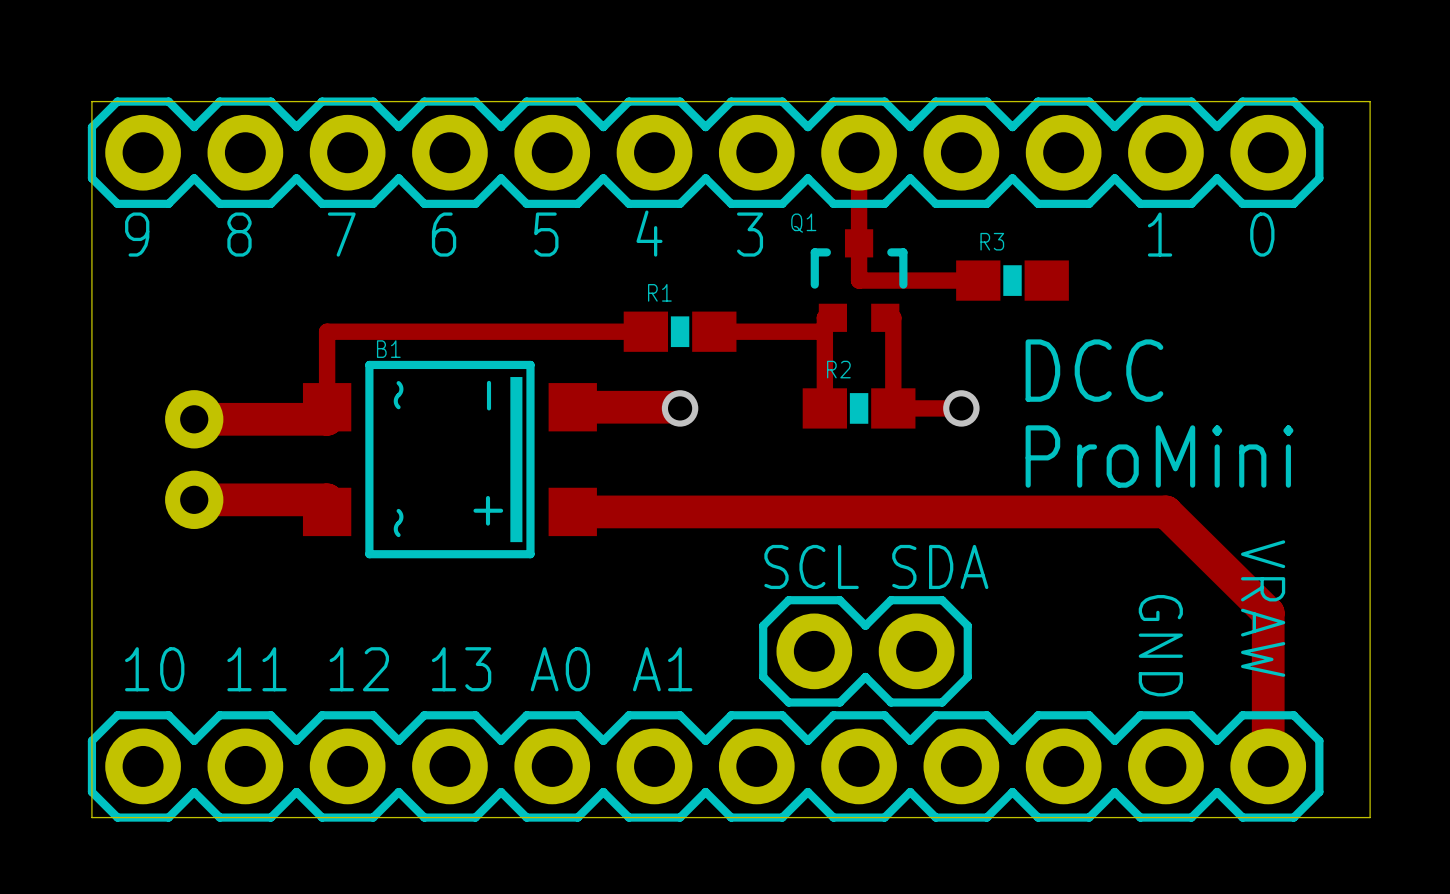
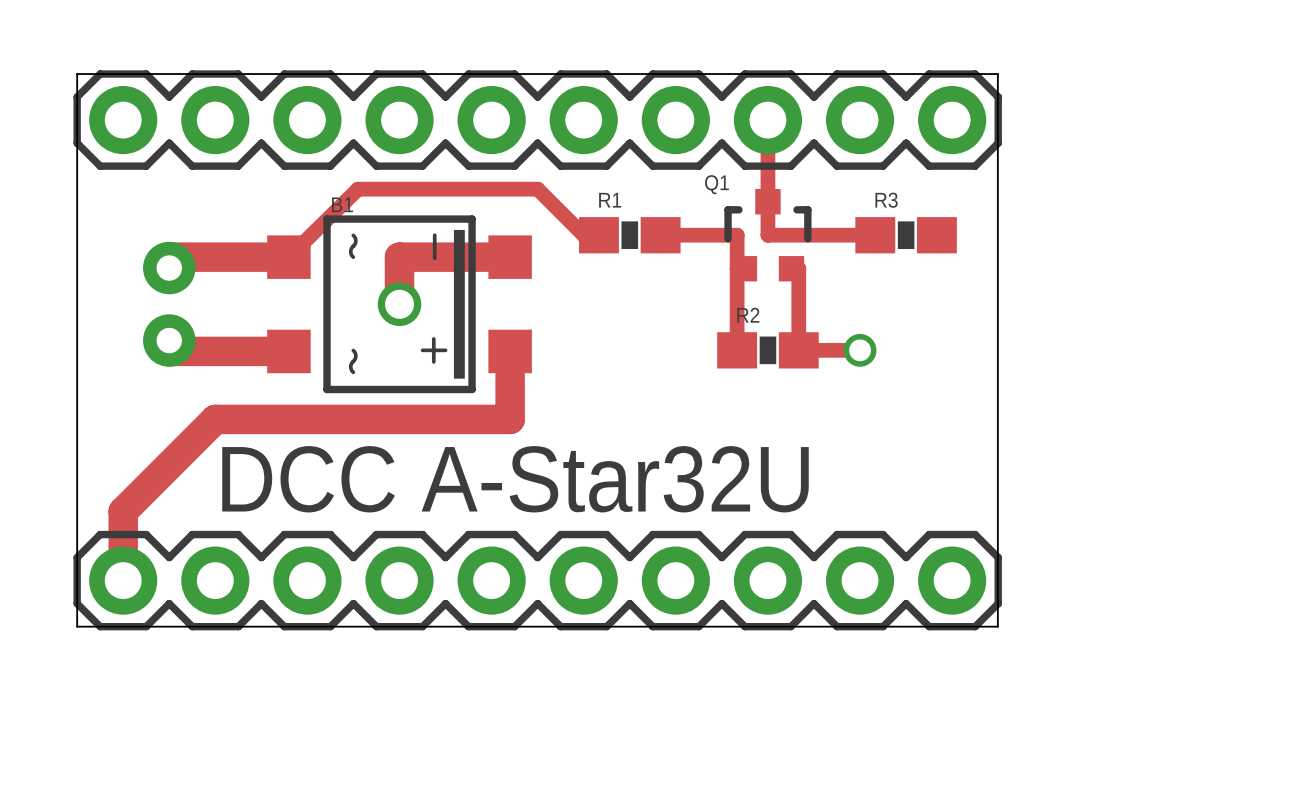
board edge: (1114, 101) (1370, 101) (1370, 817) (91, 817) (91, 715) -> (997, 74) (997, 626) (77, 626)
part: none -> (537, 120)
part: (705, 152) -> none
text: 4 (649, 233) -> none
text: 9 (137, 234) -> none
text: 8 (239, 234) -> none
text: 7 (341, 234) -> none
text: 6 (444, 234) -> none
text: 5 (546, 234) -> none
text: 3 (750, 234) -> none
text: 1 (1160, 234) -> none
text: 0 (1262, 234) -> none
track: none -> (598, 235) (583, 235) (537, 189) (358, 189) (288, 257) (170, 257) (169, 268)
track: none -> (660, 235) (737, 235) (737, 268)
track: none -> (510, 257) (399, 257) (399, 304)
track: (645, 331) (327, 331) (327, 419) (194, 419) -> none
R1 position: (680, 331) -> (629, 235)
track: (714, 331) (824, 331) -> none
via: none -> (399, 304)
text: DCC (1094, 370) -> none
track: none -> (169, 340) (168, 351) (288, 351)
track: (572, 407) (680, 408) -> none
via: (680, 408) -> none
track: none -> (510, 351) (510, 419) (215, 419) (123, 511) (123, 580)
text: ProMini (1159, 456) -> none
part position: (194, 459) -> (169, 304)
B1 position: (449, 459) -> (399, 304)
track: (194, 499) (327, 499) (327, 511) -> none
track: (572, 511) (1165, 511) (1268, 613) (1268, 766) -> none
text: none -> DCC A-Star32U (515, 479)
text: SCL (811, 566) -> none
text: SDA (940, 566) -> none
text: VRAW (1263, 608) -> none
text: GND (1160, 645) -> none
part: (865, 651) -> none
part: none -> (537, 580)
text: 10 (154, 669) -> none
text: 11 (257, 669) -> none
text: 12 (359, 669) -> none
text: 13 (461, 669) -> none
text: A0 (560, 669) -> none
text: A1 (662, 669) -> none
part: (705, 766) -> none

